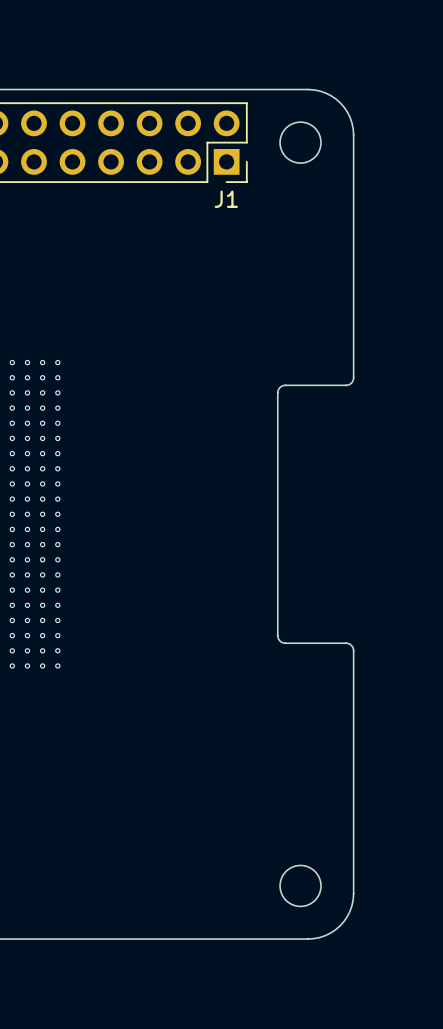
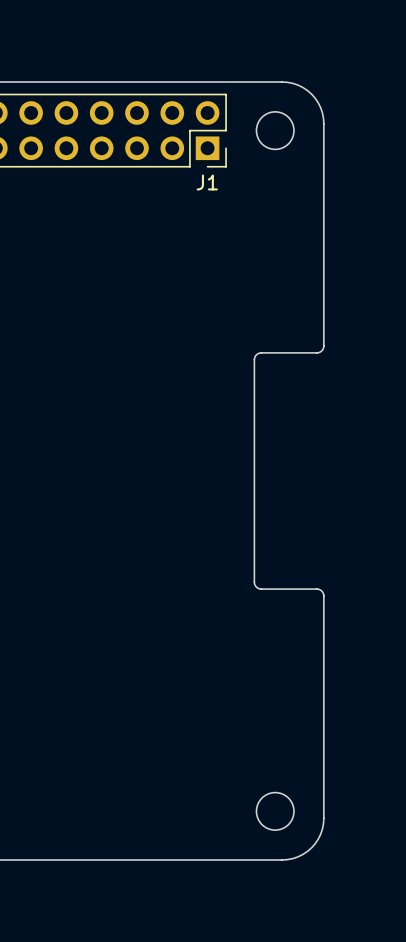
via: (12, 362) -> none
via: (27, 362) -> none
via: (42, 362) -> none
via: (57, 362) -> none
via: (12, 377) -> none
via: (27, 377) -> none
via: (42, 377) -> none
via: (57, 377) -> none
via: (12, 392) -> none
via: (27, 392) -> none
via: (42, 392) -> none
via: (57, 392) -> none
via: (12, 408) -> none
via: (27, 408) -> none
via: (42, 408) -> none
via: (57, 408) -> none
via: (12, 423) -> none
via: (27, 423) -> none
via: (42, 423) -> none
via: (57, 423) -> none
via: (12, 438) -> none
via: (27, 438) -> none
via: (42, 438) -> none
via: (57, 438) -> none
via: (12, 453) -> none
via: (27, 453) -> none
via: (42, 453) -> none
via: (57, 453) -> none
via: (12, 468) -> none
via: (27, 468) -> none
via: (42, 468) -> none
via: (57, 468) -> none
via: (12, 483) -> none
via: (27, 483) -> none
via: (42, 483) -> none
via: (57, 483) -> none
via: (12, 499) -> none
via: (27, 499) -> none
via: (42, 499) -> none
via: (57, 499) -> none
via: (12, 514) -> none
via: (27, 514) -> none
via: (42, 514) -> none
via: (57, 514) -> none
via: (12, 529) -> none
via: (27, 529) -> none
via: (42, 529) -> none
via: (57, 529) -> none
via: (12, 544) -> none
via: (27, 544) -> none
via: (42, 544) -> none
via: (57, 544) -> none
via: (12, 559) -> none
via: (27, 559) -> none
via: (42, 559) -> none
via: (57, 559) -> none
via: (12, 574) -> none
via: (27, 574) -> none
via: (42, 574) -> none
via: (57, 574) -> none
via: (12, 590) -> none
via: (27, 590) -> none
via: (42, 590) -> none
via: (57, 590) -> none
via: (12, 605) -> none
via: (27, 605) -> none
via: (42, 605) -> none
via: (57, 605) -> none
via: (12, 620) -> none
via: (27, 620) -> none
via: (42, 620) -> none
via: (57, 620) -> none
via: (12, 635) -> none
via: (27, 635) -> none
via: (42, 635) -> none
via: (57, 635) -> none
via: (12, 650) -> none
via: (27, 650) -> none
via: (42, 650) -> none
via: (57, 650) -> none
via: (12, 665) -> none
via: (27, 665) -> none
via: (42, 665) -> none
via: (57, 665) -> none

